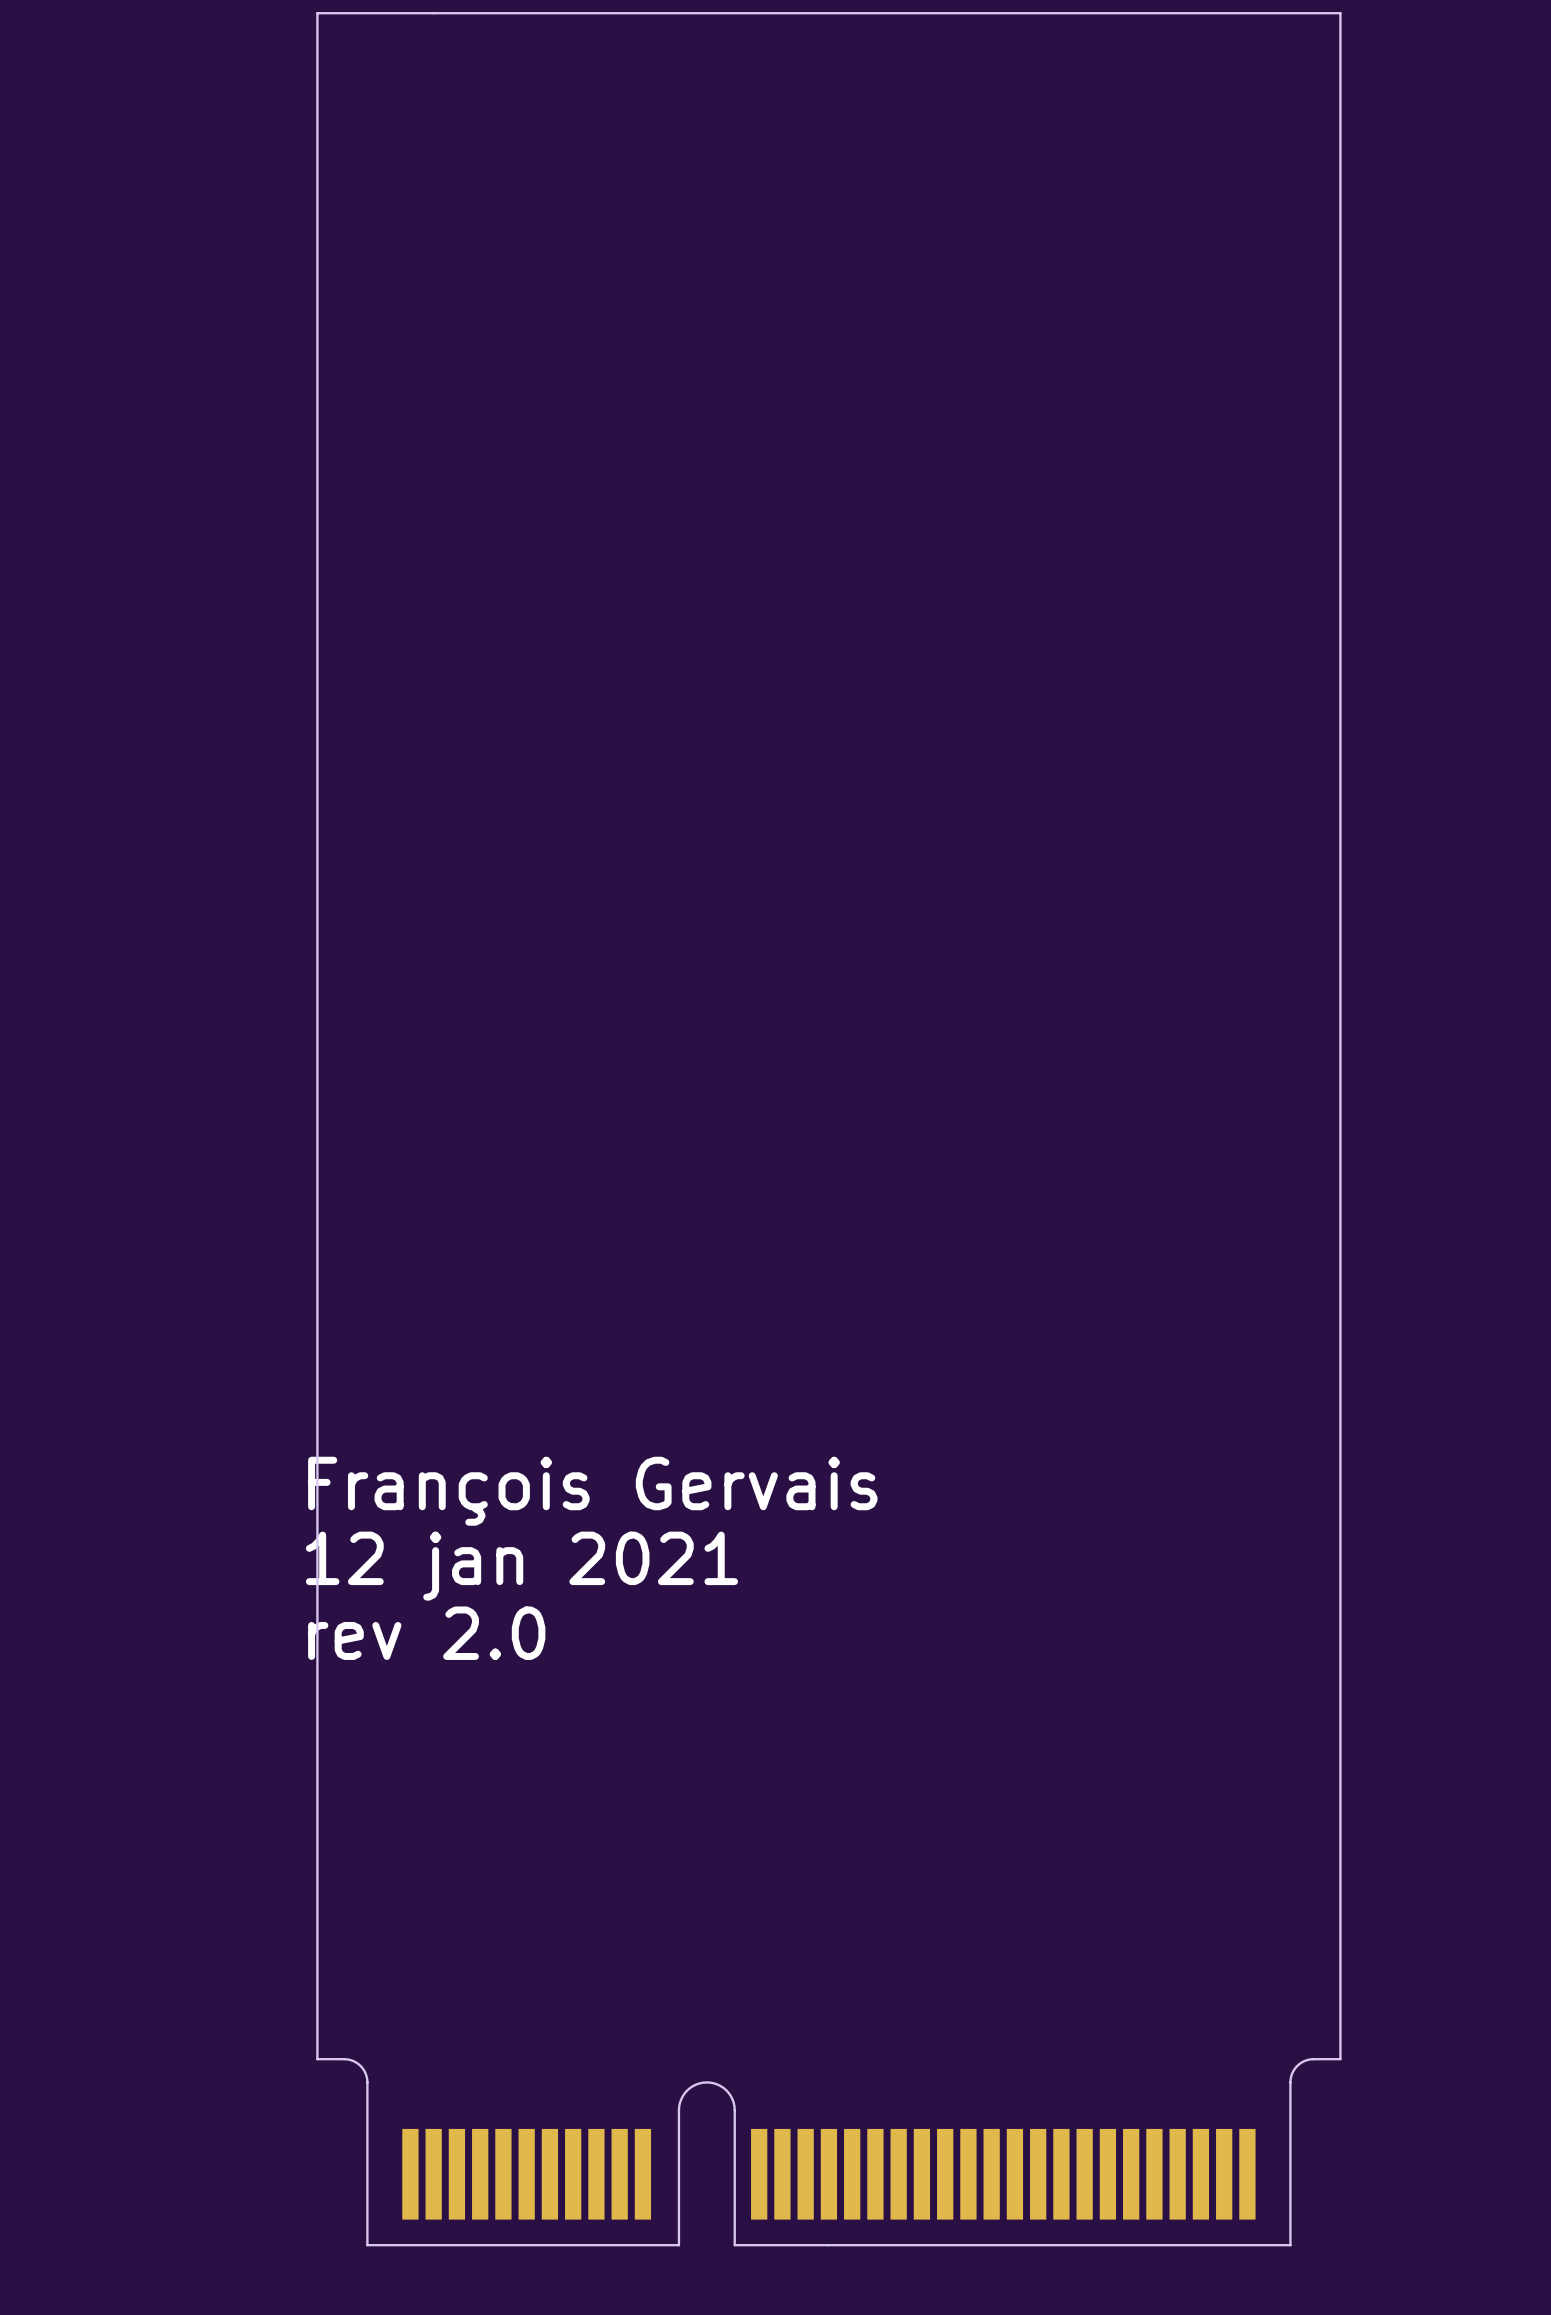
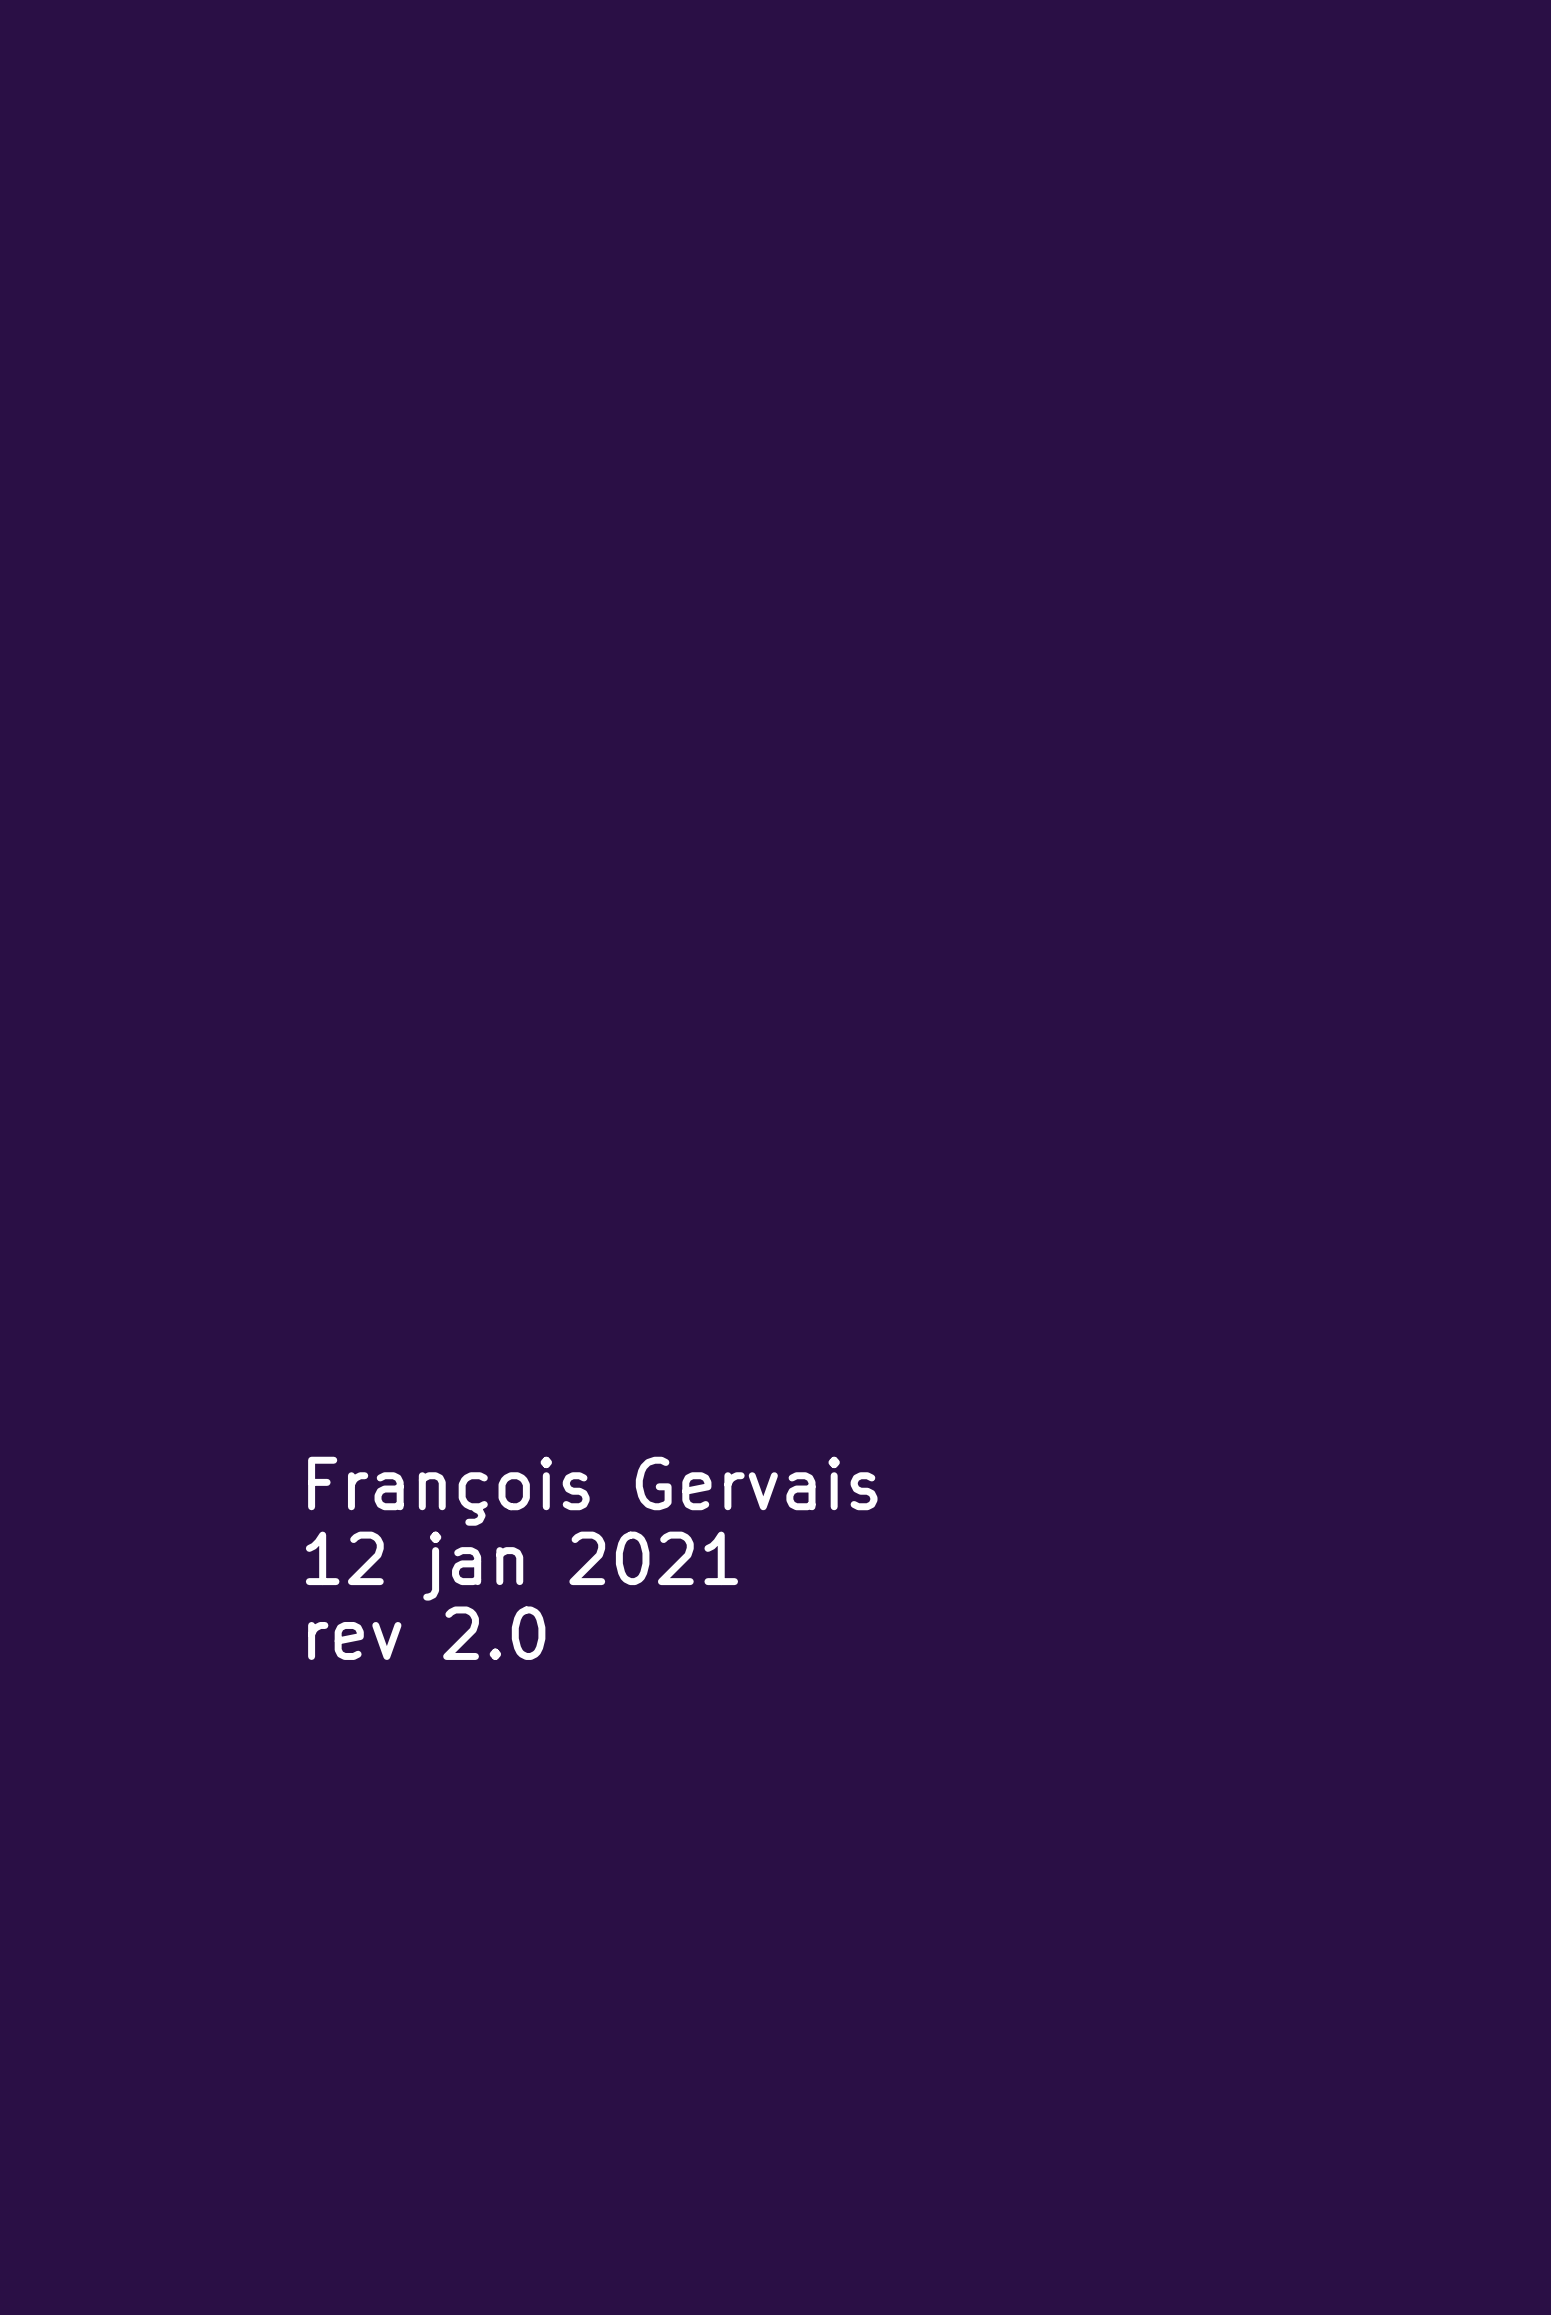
board edge: (1340, 2059) (1340, 13) (317, 13) (317, 2059) -> none
part: (828, 2152) -> none

